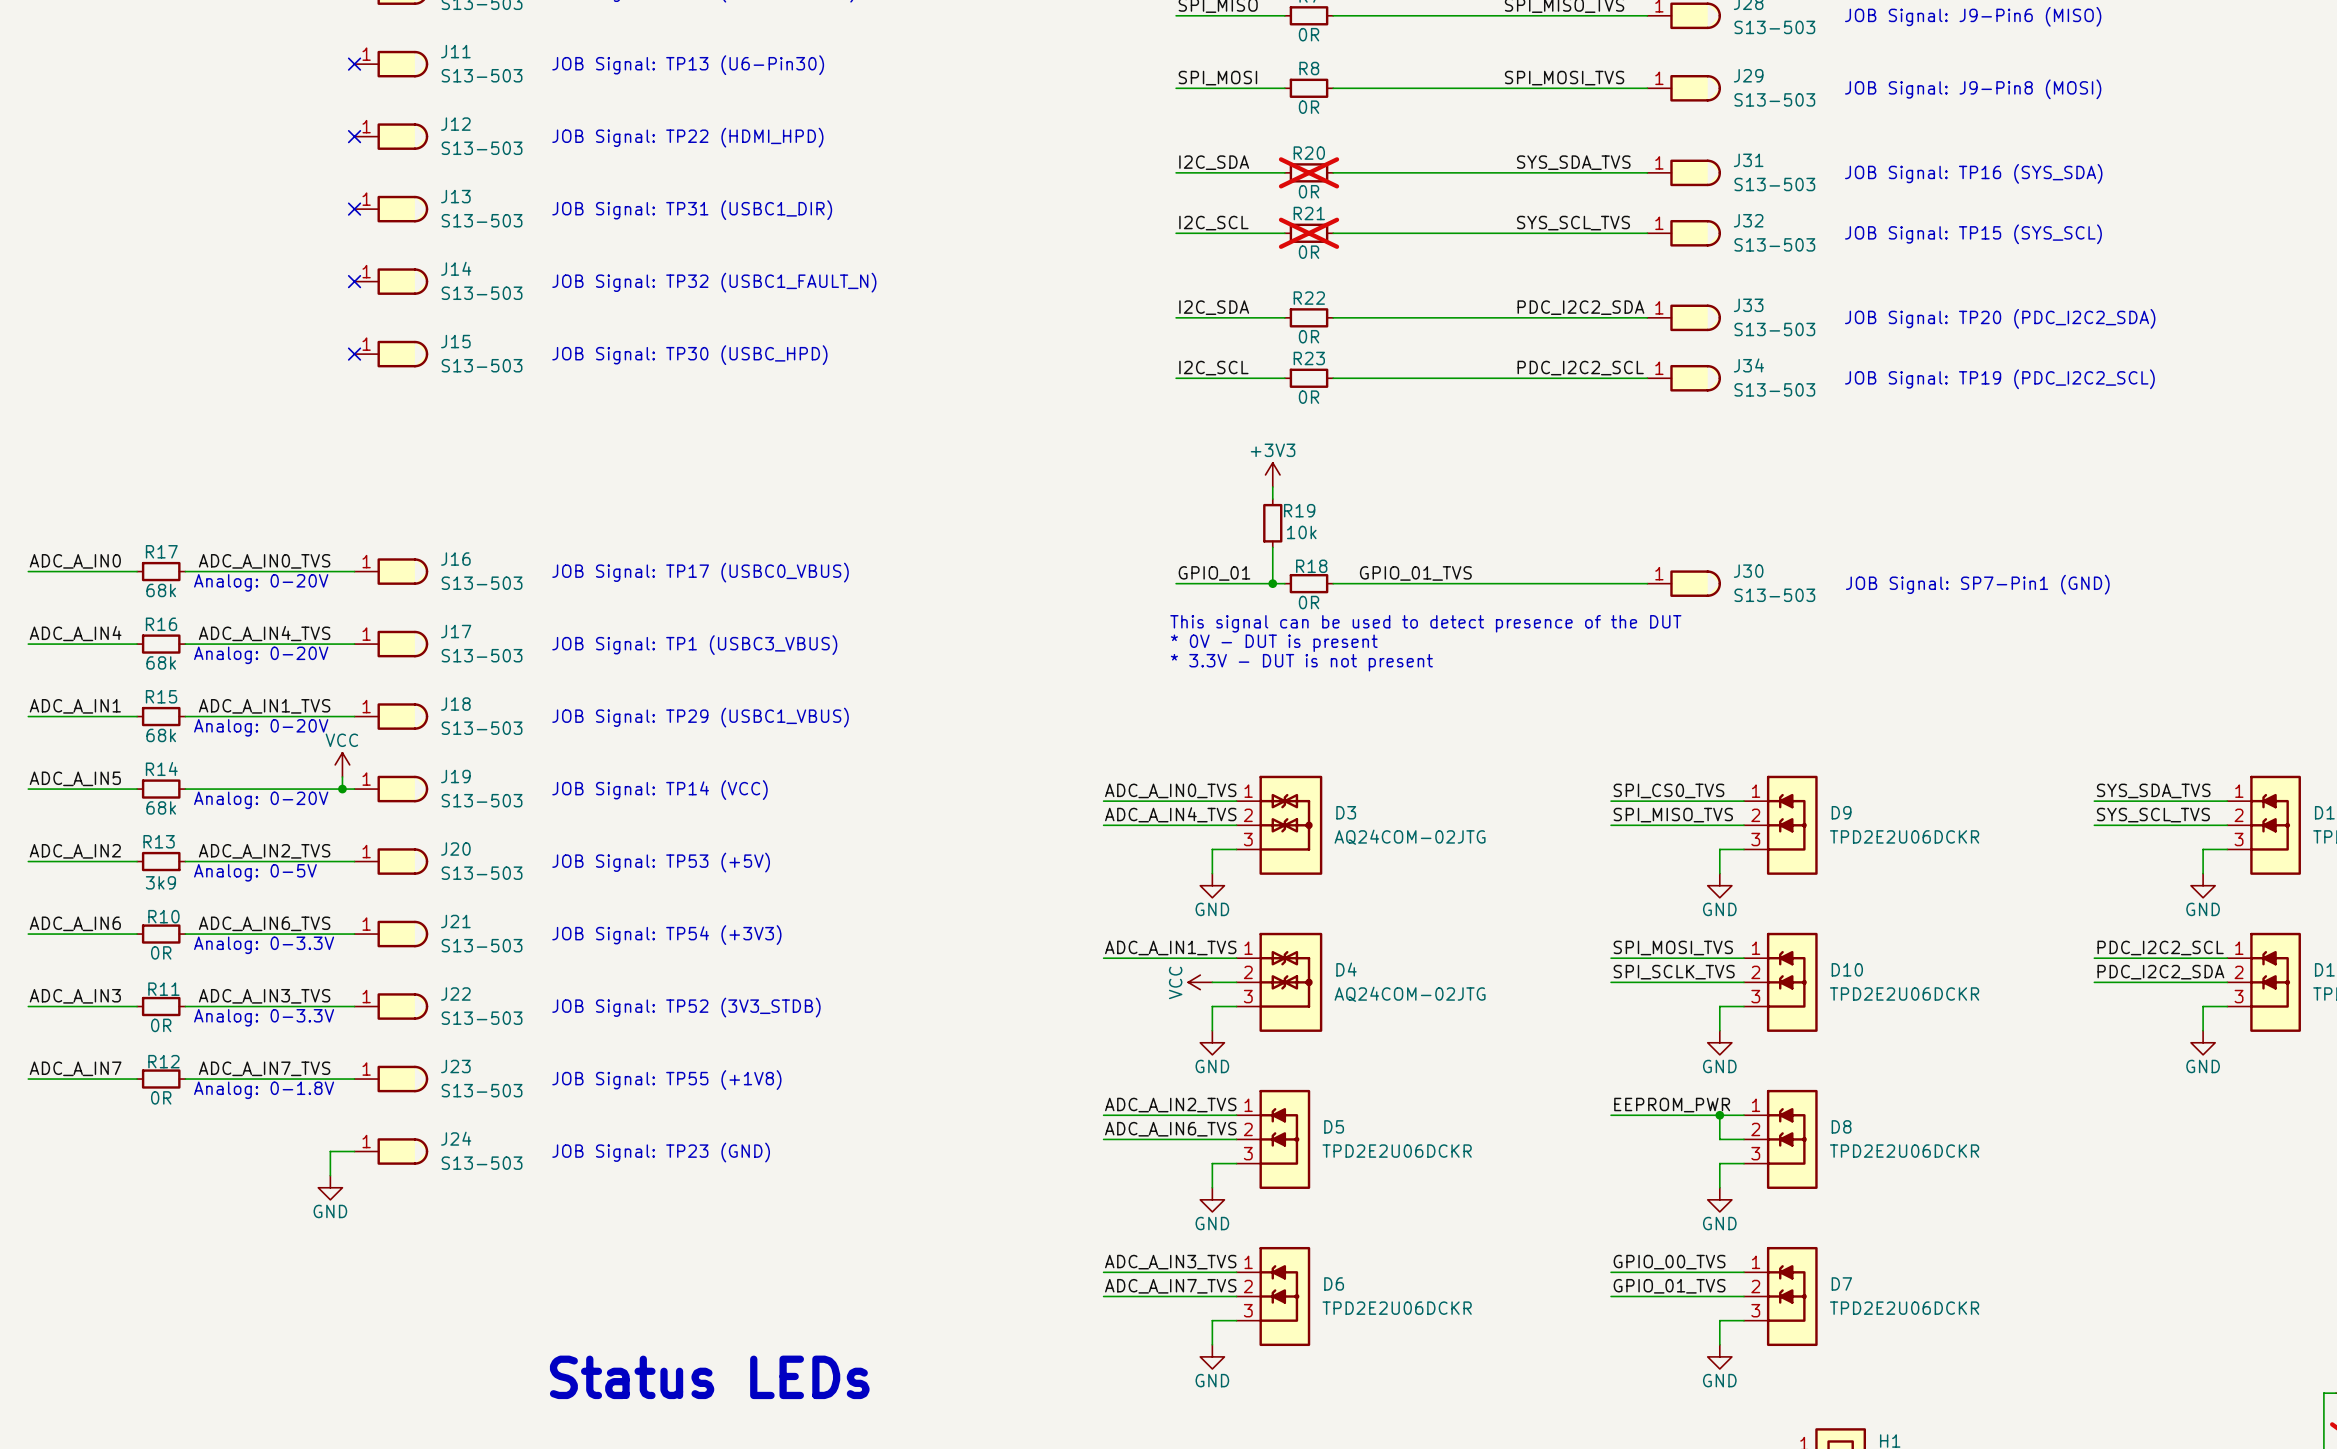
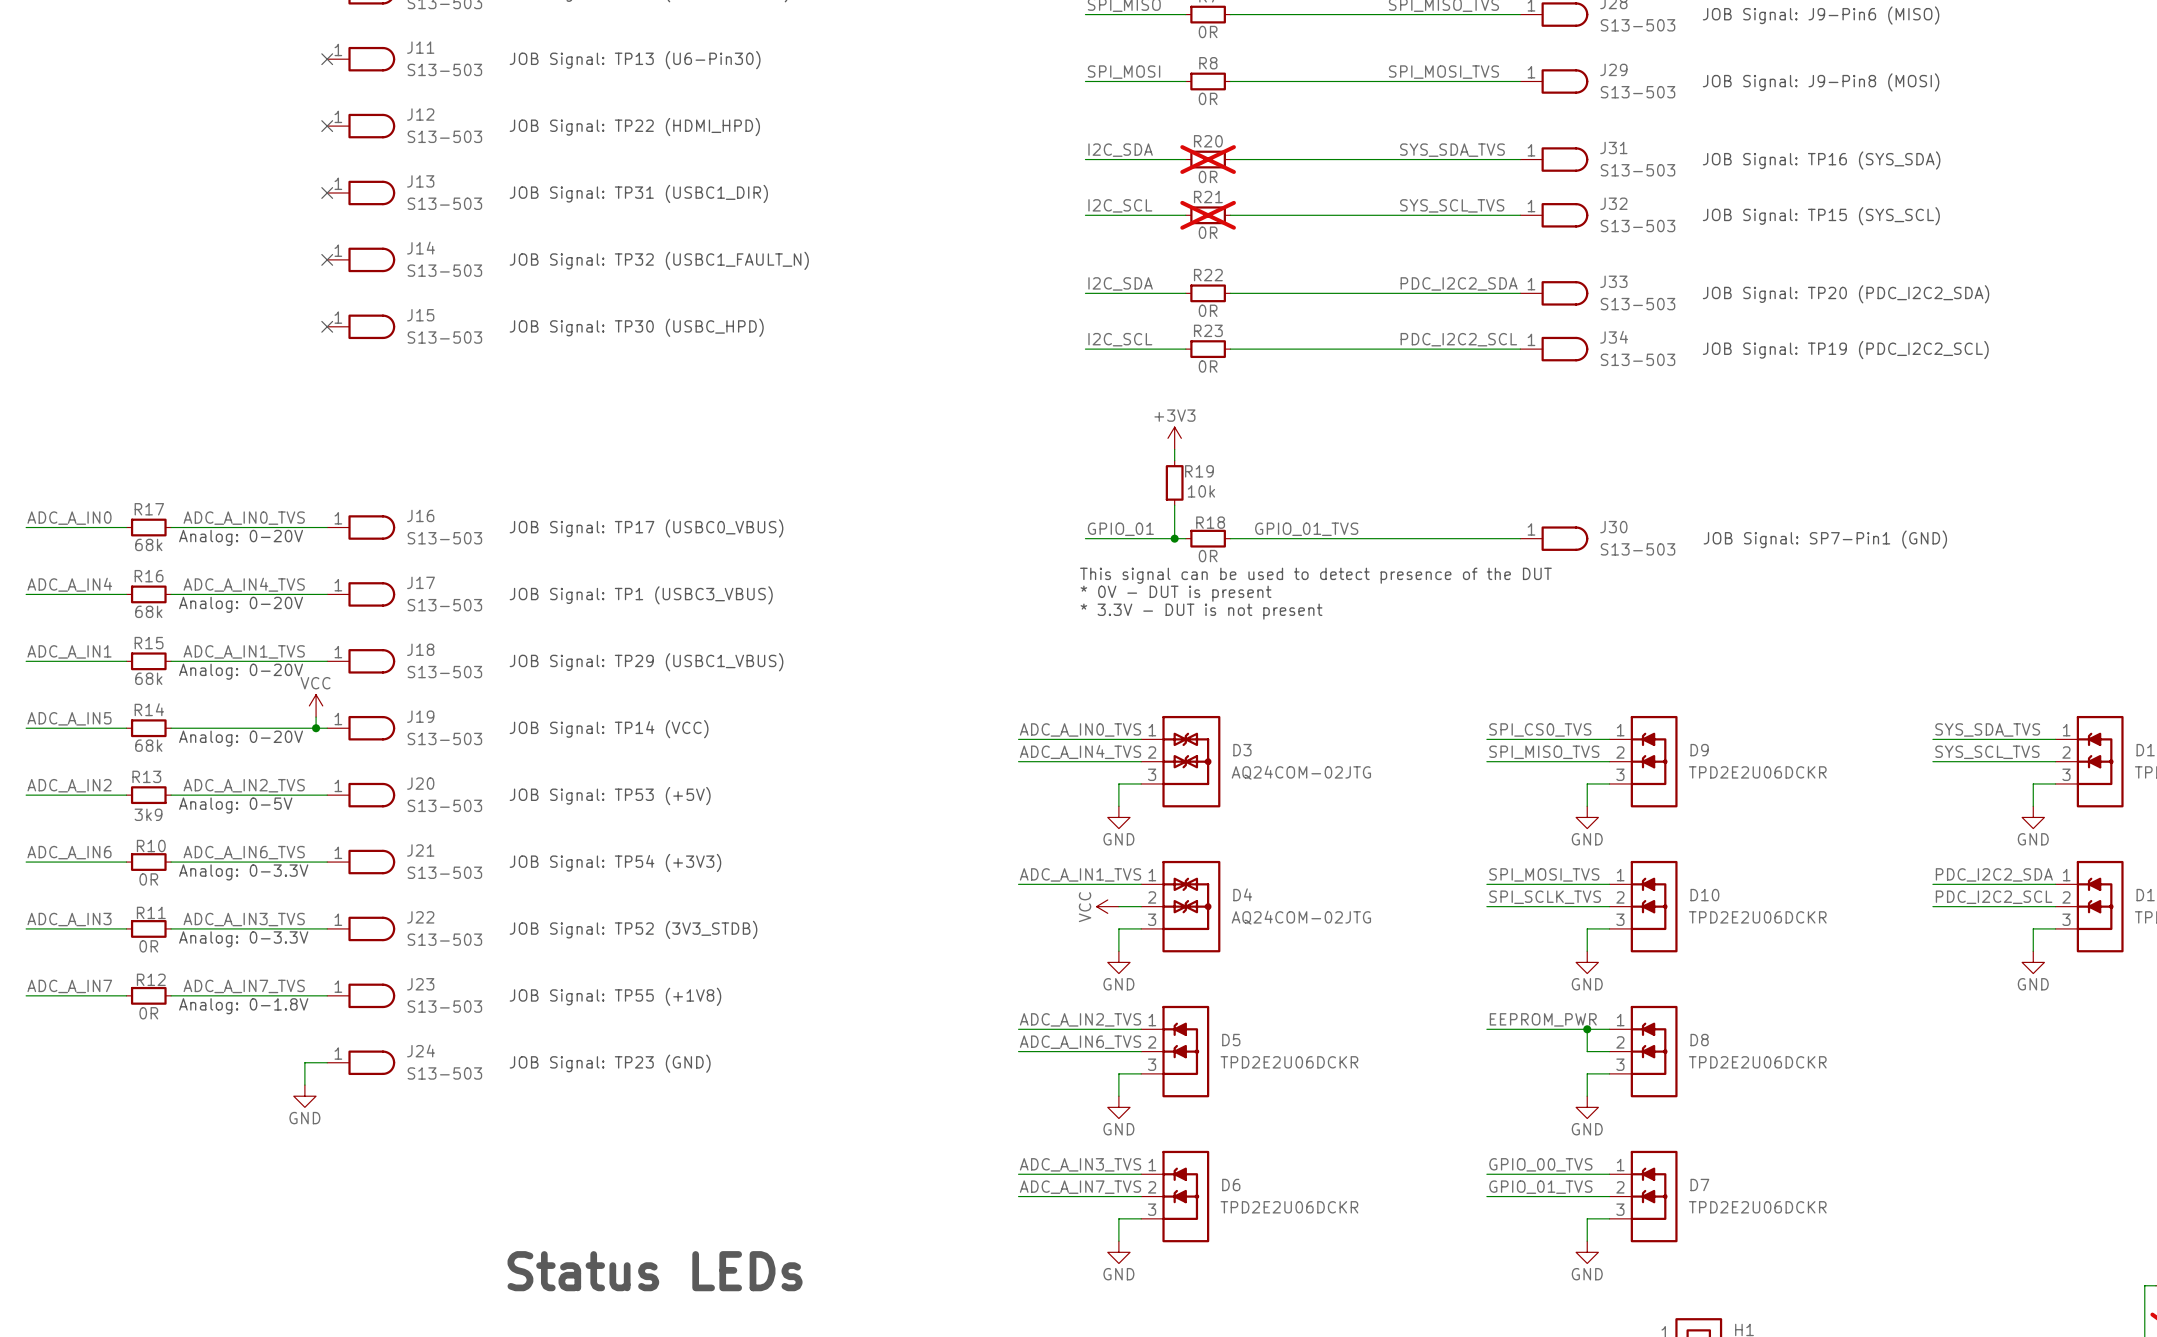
label: PDC_I2C2_SCL (2160, 947) -> PDC_I2C2_SDA (1994, 874)
label: PDC_I2C2_SDA (2160, 972) -> PDC_I2C2_SCL (1994, 897)

